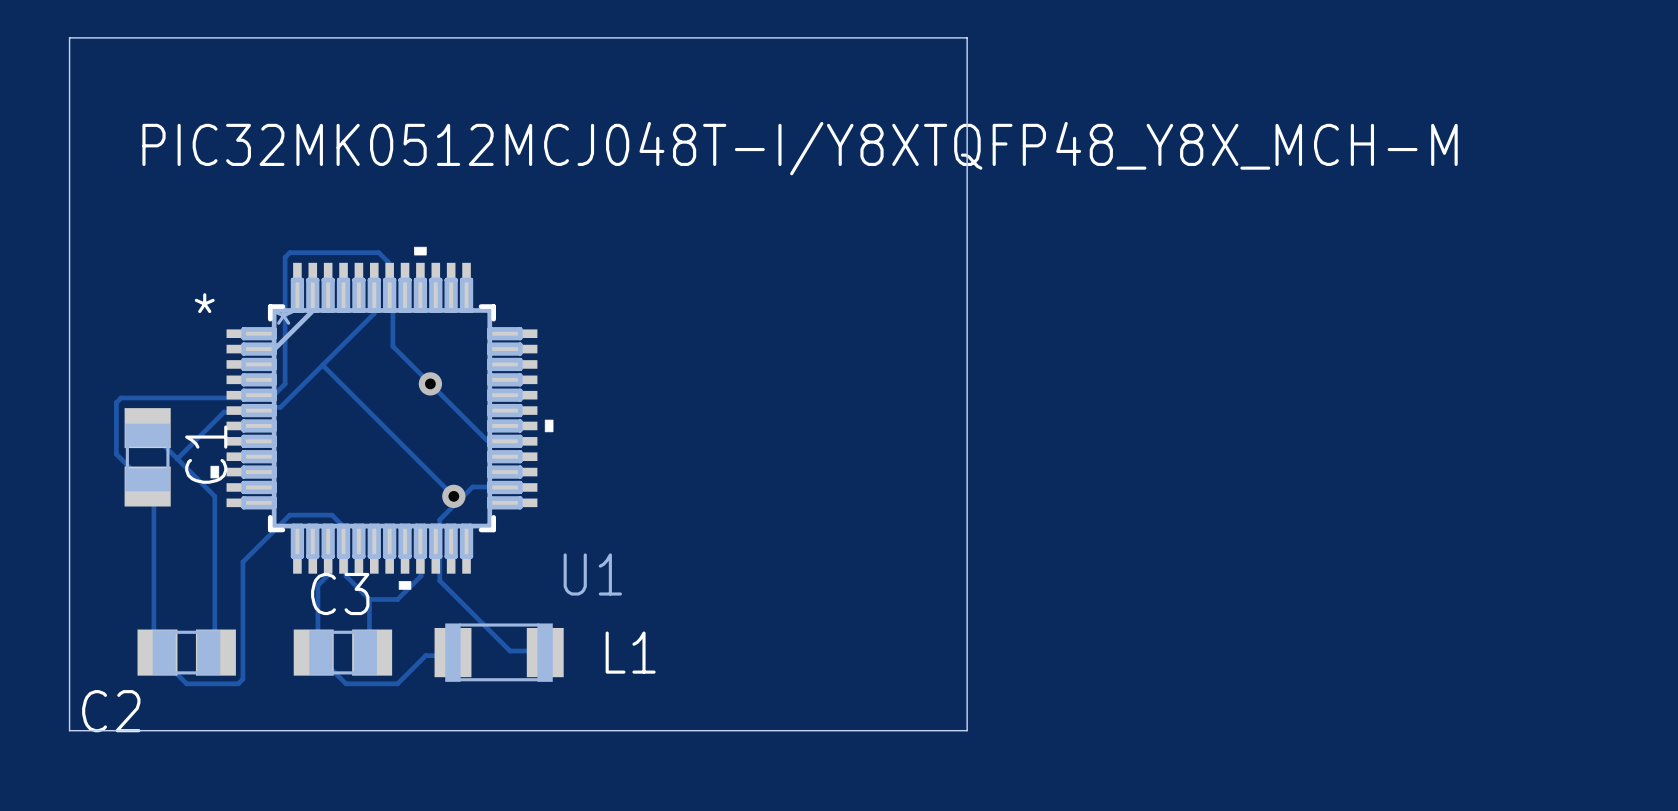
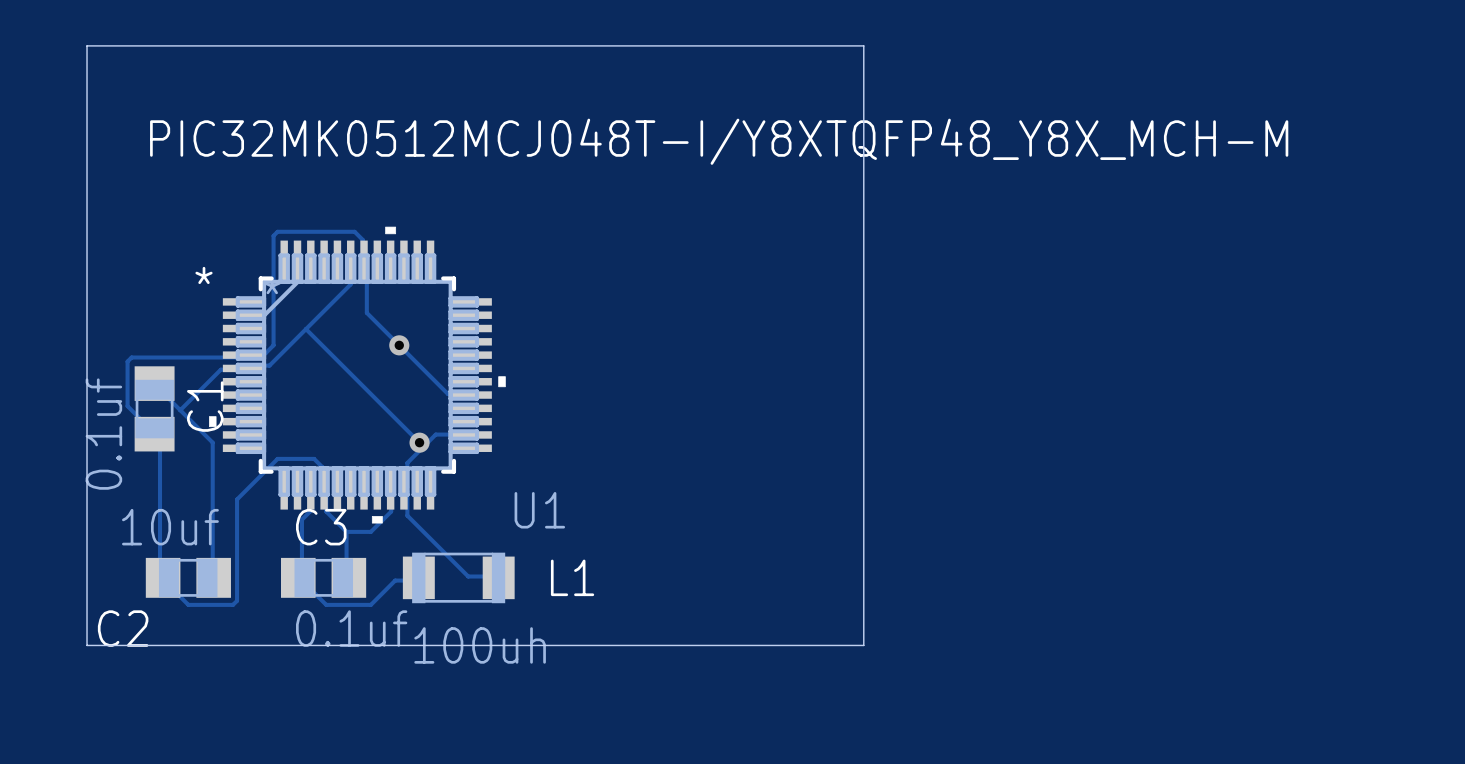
C1 value: none -> 0.1uf (103, 434)
C2 value: none -> 10uf (170, 527)
C3 value: none -> 0.1uf (351, 628)
L1 value: none -> 100uh (480, 645)

